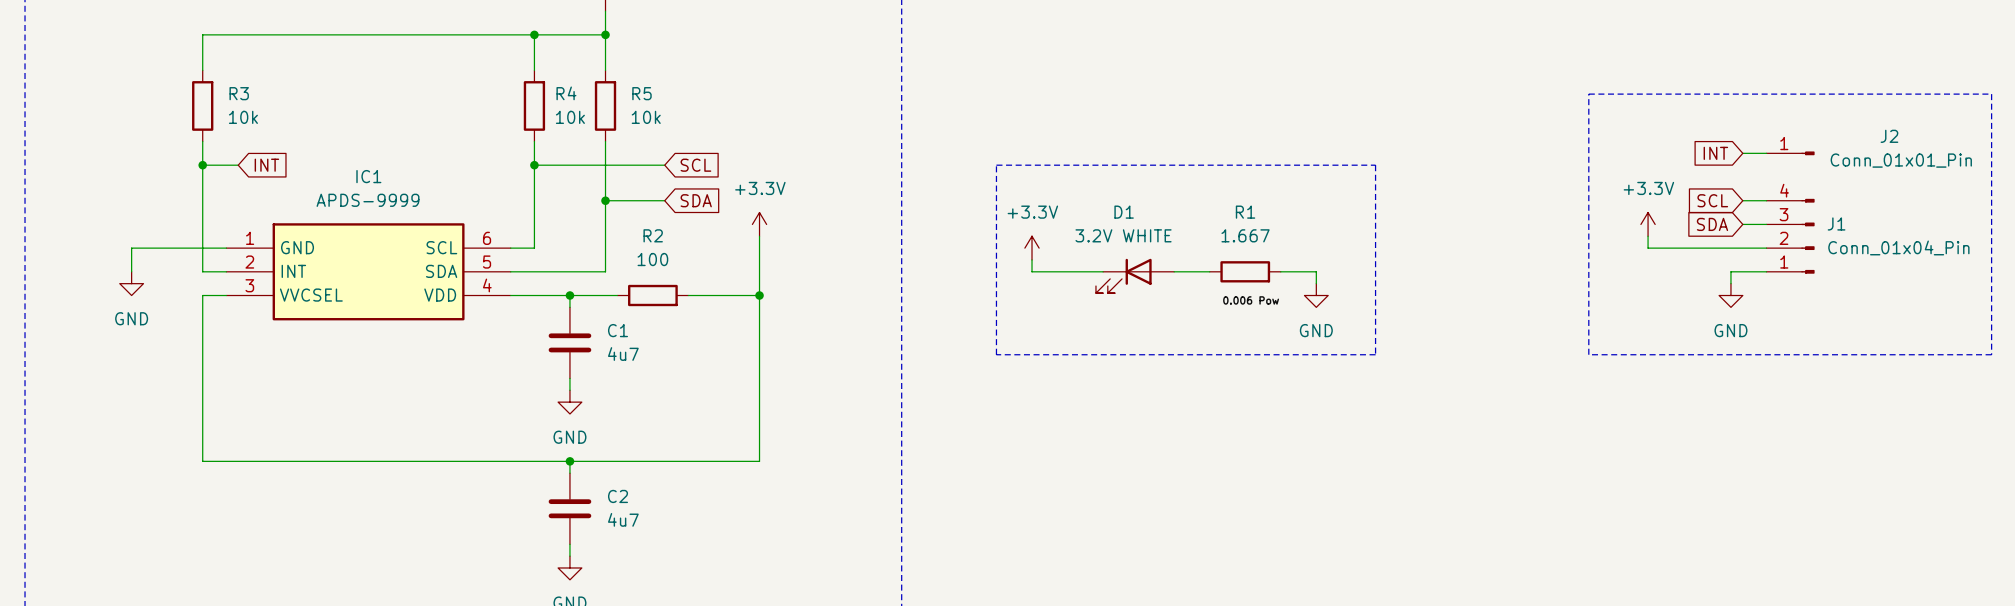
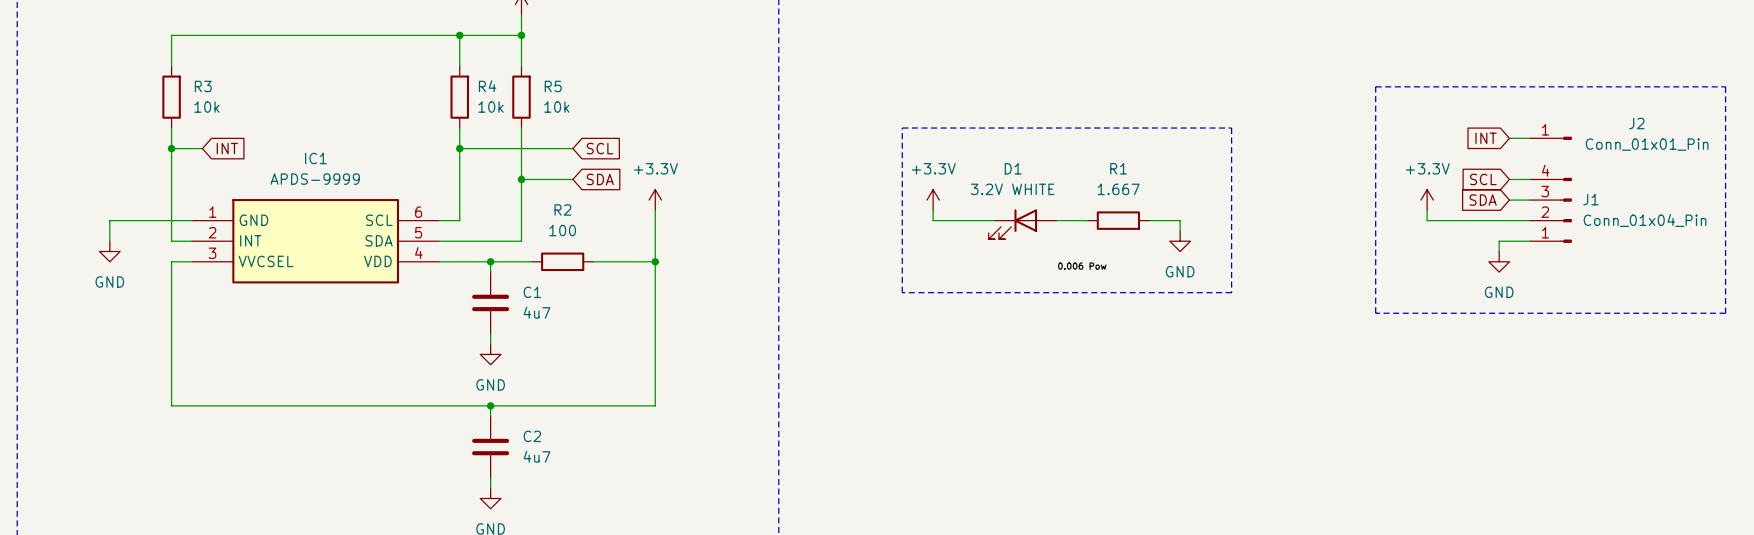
line: (996, 165) (1375, 165) (1375, 354) (996, 354) (996, 165) -> (902, 128) (1231, 128) (1231, 292) (902, 292) (902, 128)
power symbol position: +3.3V (1032, 248) -> +3.3V (933, 200)
wire: (1032, 259) (1032, 271) (1103, 271) -> (933, 210) (933, 220) (994, 220)
wire: (1174, 271) (1209, 271) -> (1056, 220) (1087, 220)
R1 position: (1245, 271) -> (1118, 220)
wire: (1280, 271) (1316, 271) (1316, 283) -> (1149, 220) (1180, 220) (1180, 230)
D1 position: (1135, 275) -> (1022, 224)
power symbol position: GND (1316, 295) -> GND (1180, 241)

